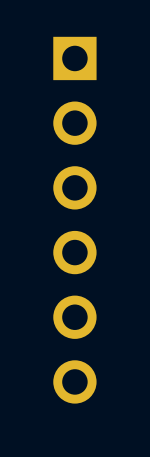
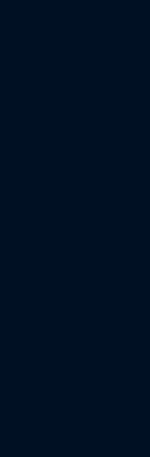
part: (74, 220) -> none

